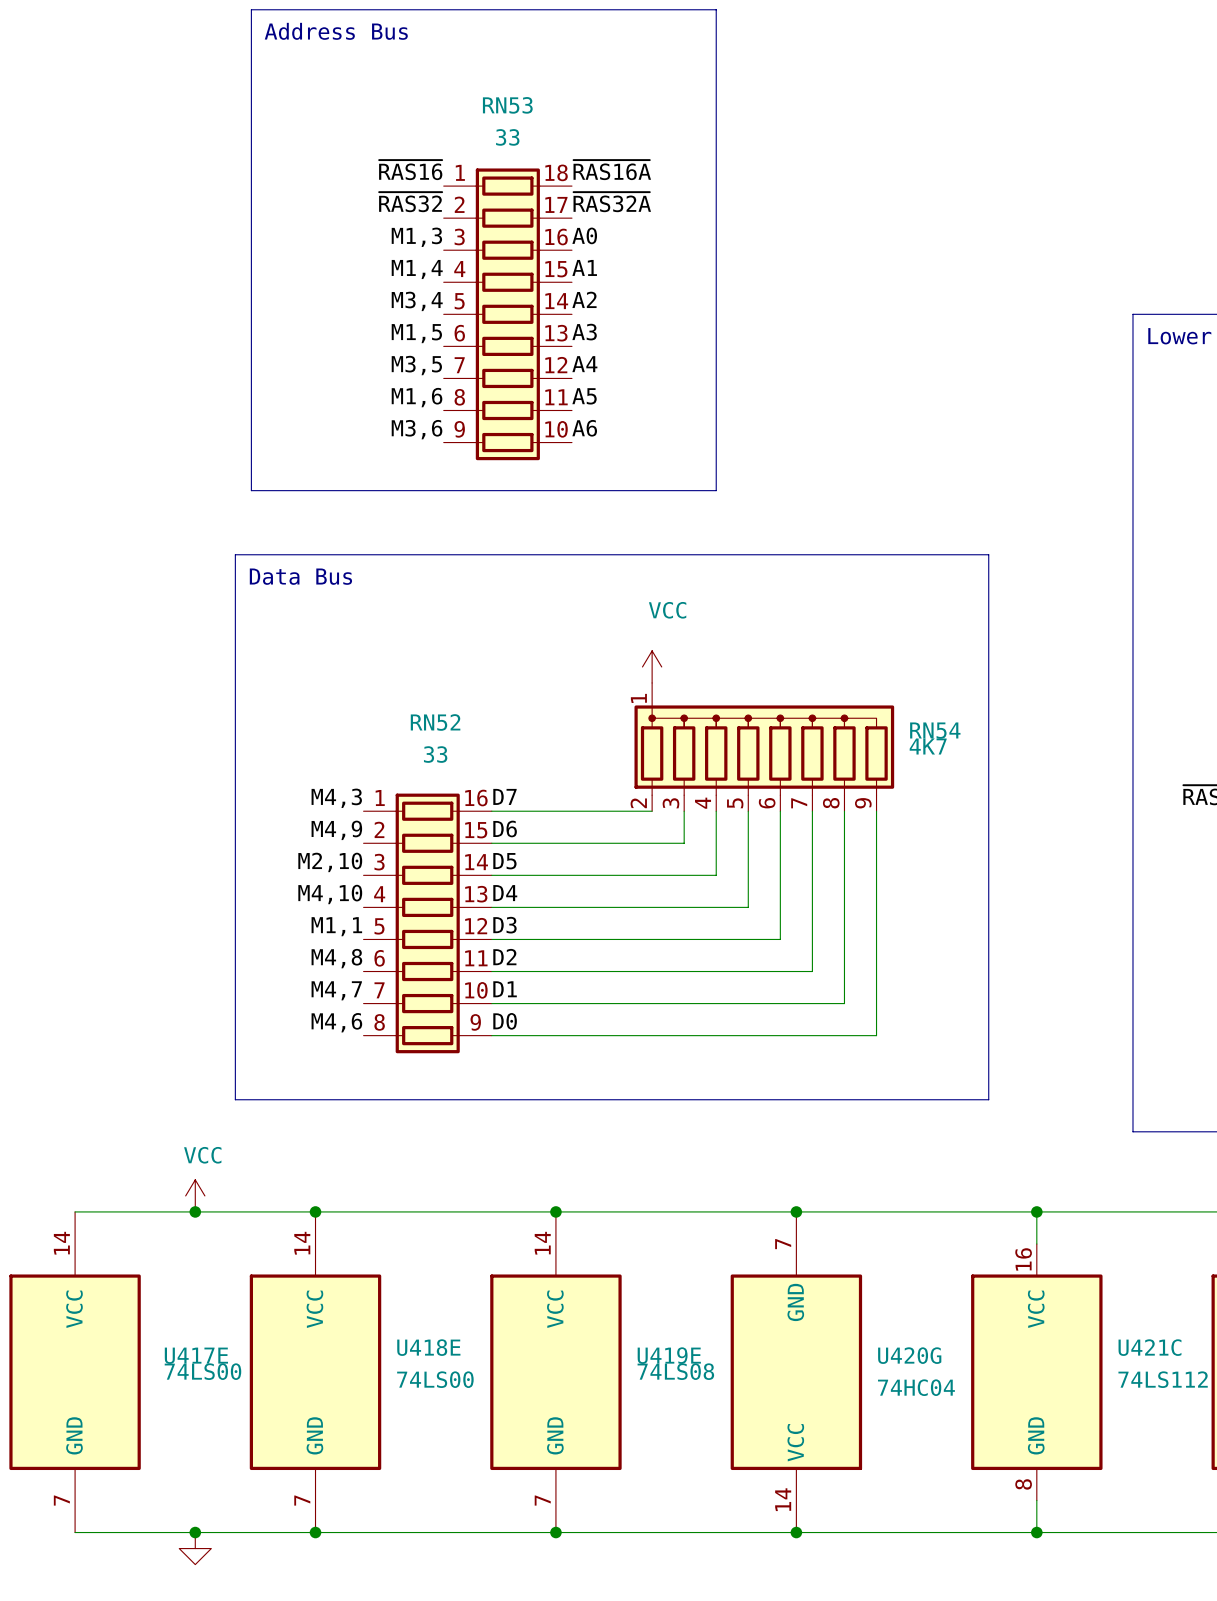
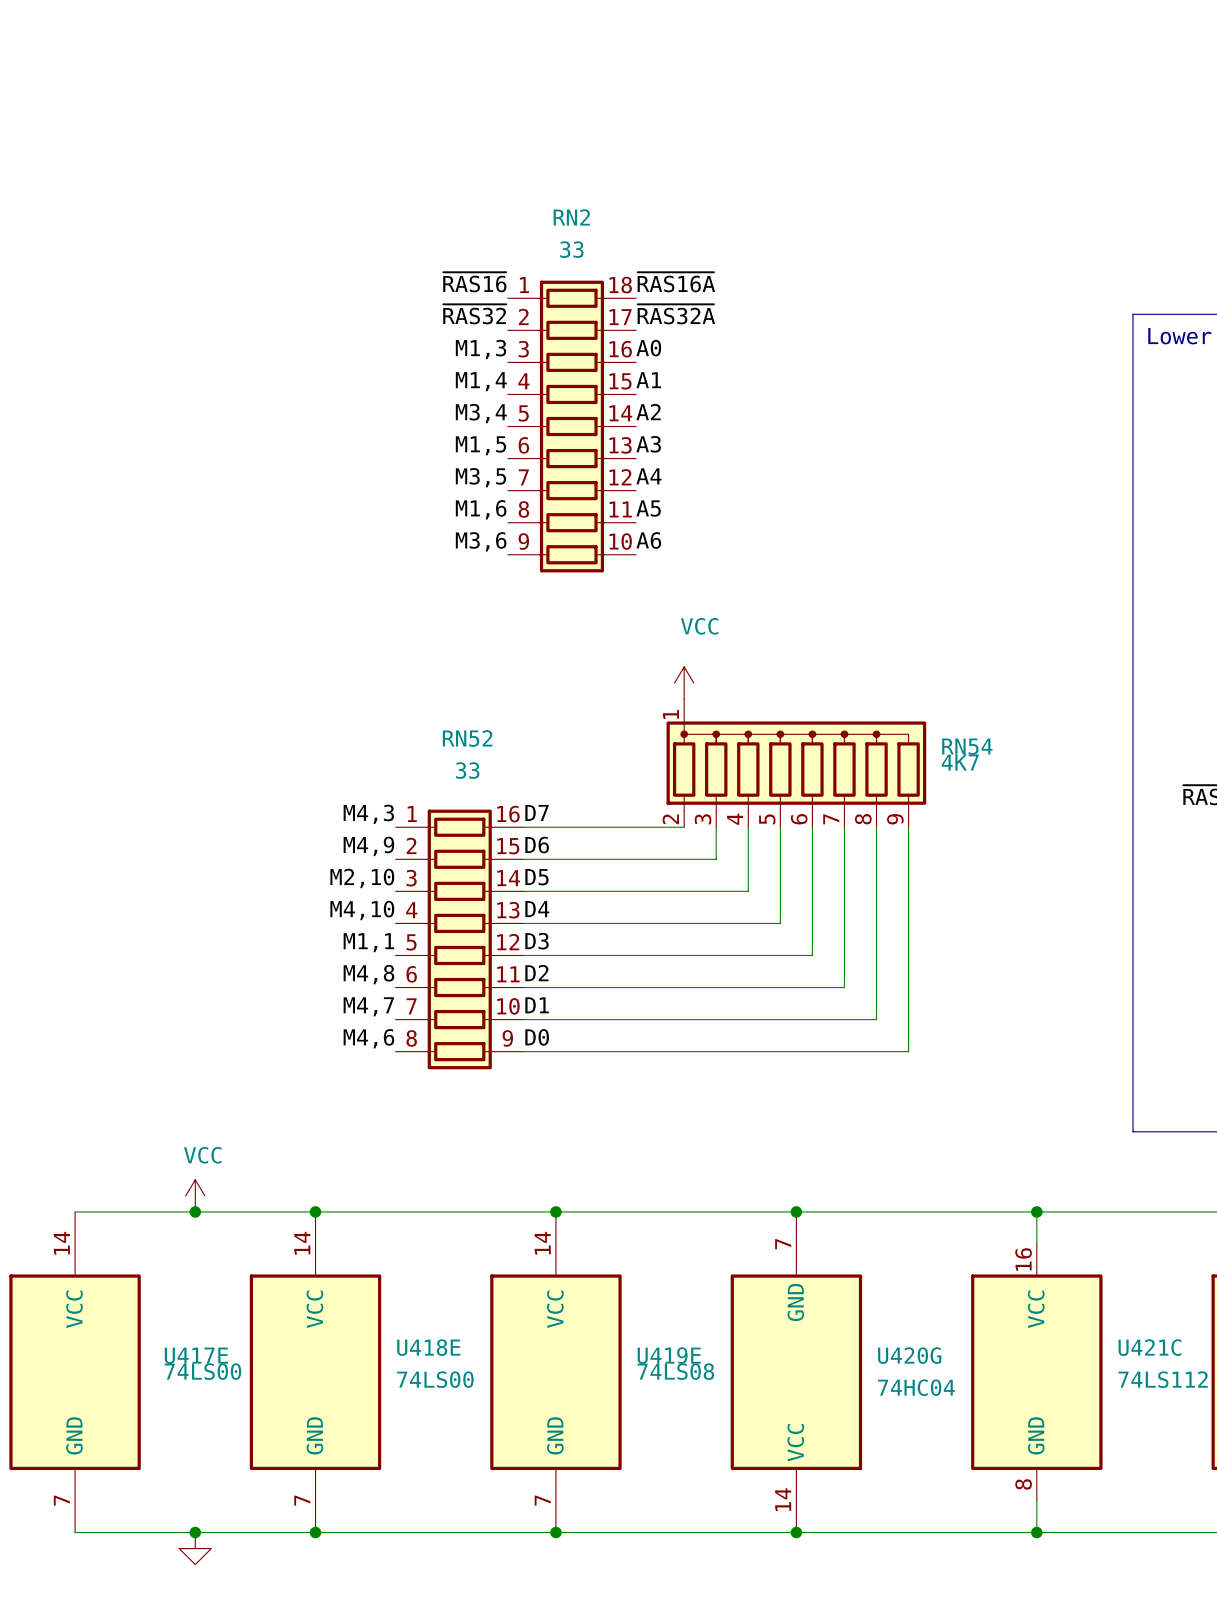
line: (251, 9) (716, 9) (716, 490) (251, 490) (251, 9) -> none
text: Address Bus (336, 31) -> none
label position: ~{RAS16} (410, 170) -> ~{RAS16} (474, 282)
label position: ~{RAS16A} (612, 170) -> ~{RAS16A} (676, 282)
label position: ~{RAS32} (410, 202) -> ~{RAS32} (474, 314)
label position: ~{RAS32A} (612, 202) -> ~{RAS32A} (676, 314)
label position: A0 (584, 235) -> A0 (648, 348)
label position: M1,3 (416, 237) -> M1,3 (481, 349)
label position: A1 (584, 267) -> A1 (648, 380)
label position: M1,4 (417, 269) -> M1,4 (481, 381)
label position: A2 (584, 299) -> A2 (648, 412)
label position: M3,4 (417, 301) -> M3,4 (481, 413)
RN53: 33 (507, 314) -> none
label position: A3 (584, 332) -> A3 (648, 444)
label position: M1,5 (416, 333) -> M1,5 (480, 445)
label position: A4 (584, 364) -> A4 (649, 476)
label position: M3,5 (416, 365) -> M3,5 (480, 477)
label position: A5 (584, 396) -> A5 (648, 508)
label position: M1,6 (417, 397) -> M1,6 (481, 509)
RN2: none -> 33 (571, 426)
label position: A6 (584, 428) -> A6 (648, 540)
label position: M3,6 (417, 429) -> M3,6 (481, 541)
line: (235, 554) (988, 554) (988, 1099) (235, 1099) (235, 554) -> none
text: Data Bus (300, 576) -> none
power symbol position: VCC (652, 666) -> VCC (684, 682)
RN54 position: (764, 747) -> (796, 763)
label position: D7 (504, 796) -> D7 (537, 812)
label position: M4,3 (336, 798) -> M4,3 (368, 814)
wire: (491, 811) (652, 811) -> (523, 827) (684, 827)
wire: (684, 811) (684, 843) (491, 843) -> none
wire: none -> (908, 827) (908, 1051) (523, 1051)
label position: D6 (505, 828) -> D6 (537, 845)
label position: M4,9 (336, 830) -> M4,9 (368, 846)
wire: (716, 859) (716, 875) (491, 875) -> (716, 859) (523, 859)
label position: D5 (504, 861) -> D5 (536, 877)
label position: M2,10 (330, 862) -> M2,10 (362, 878)
wire: (748, 891) (748, 907) (491, 907) -> (748, 891) (523, 891)
label position: D4 (505, 893) -> D4 (537, 909)
label position: M4,10 (330, 894) -> M4,10 (362, 910)
RN52 position: (427, 923) -> (459, 939)
wire: (780, 923) (780, 939) (491, 939) -> (780, 923) (523, 923)
label position: D3 (504, 925) -> D3 (537, 941)
label position: M1,1 (336, 926) -> M1,1 (368, 942)
wire: (812, 955) (812, 971) (491, 971) -> (812, 955) (523, 955)
label position: D2 (504, 957) -> D2 (536, 973)
label position: M4,8 (336, 958) -> M4,8 (368, 974)
wire: (844, 987) (844, 1003) (491, 1003) -> (844, 987) (523, 987)
label position: D1 (505, 989) -> D1 (537, 1005)
label position: M4,7 (336, 990) -> M4,7 (368, 1006)
wire: (876, 1019) (876, 1035) (491, 1035) -> (876, 1019) (523, 1019)
label position: D0 (505, 1021) -> D0 (537, 1037)
label position: M4,6 (336, 1022) -> M4,6 (368, 1038)

